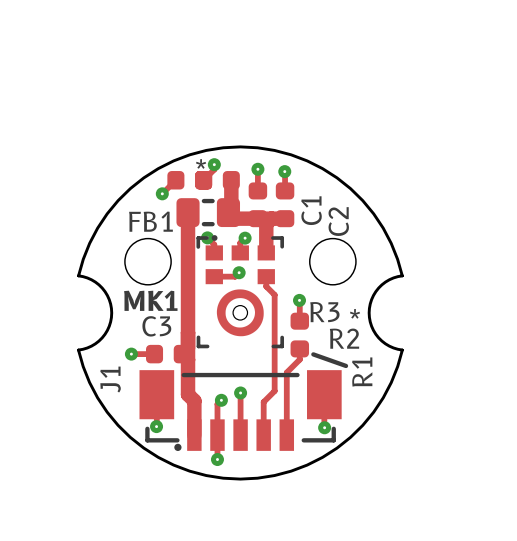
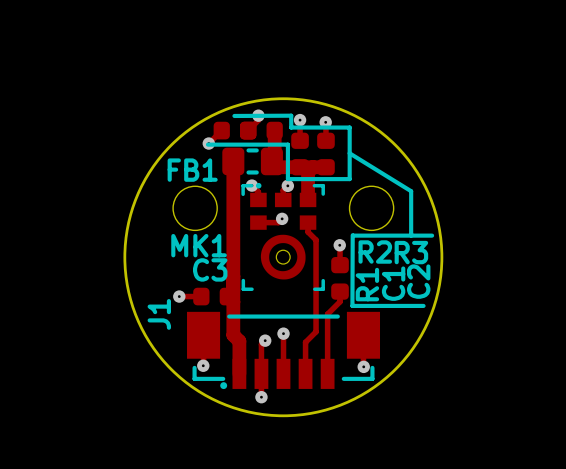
round board edge: none -> [123, 97, 444, 418]
text: * (201, 163) -> none
line: none -> (234, 115) (291, 115) (291, 127) (349, 127) (349, 179) (287, 179) (287, 144) (207, 144)
line: none -> (349, 153) (411, 191) (411, 235)
C1 name position: C1 (311, 210) -> C1 (393, 283)
C2 name position: C2 (338, 221) -> C2 (418, 281)
board edge: (78, 275) (83, 259) (97, 228) (118, 200) (143, 177) (173, 160) (206, 150) (240, 146) (274, 150) (307, 160) (337, 177) (362, 200) (383, 228) (391, 243) (402, 275) (385, 282) (375, 291) (370, 303) (369, 317) (373, 330) (381, 341) (393, 347) (402, 350) (397, 366) (383, 397) (362, 425) (337, 448) (307, 465) (274, 475) (240, 479) (206, 475) (173, 465) (143, 448) (118, 425) (97, 397) (89, 382) (78, 350) (95, 343) (105, 334) (110, 321) (111, 308) (107, 295) (99, 284) (87, 277) (78, 275) -> none
line: none -> (352, 235) (352, 305) (423, 305)
line: none -> (353, 235) (432, 235)
R3 name position: R3 (324, 312) -> R3 (411, 252)
text: * (355, 313) -> none
R2 name position: R2 (344, 338) -> R2 (375, 252)
line: (313, 354) (345, 365) -> none
R1 name position: R1 (362, 372) -> R1 (367, 284)

